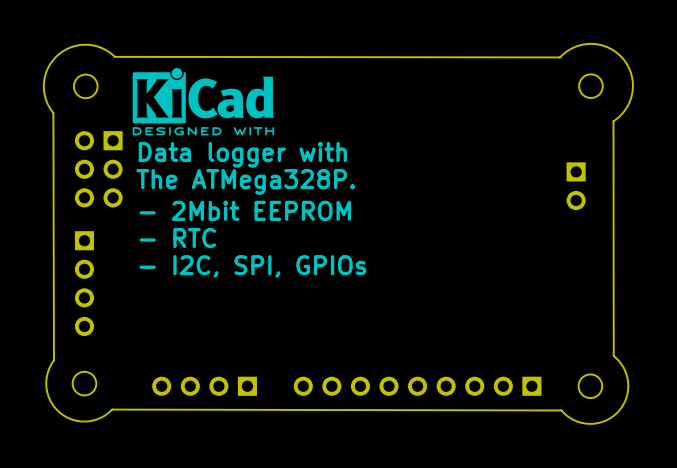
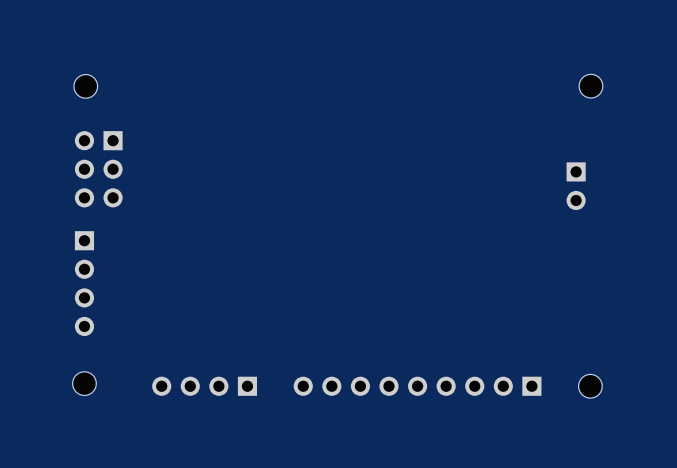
board edge: (114, 56) (96, 46) (75, 45) (61, 52) (53, 59) (44, 78) (44, 94) (53, 113) (53, 360) -> none
board edge: (115, 56) (560, 57) (572, 48) (586, 44) (597, 44) (611, 49) (626, 62) (632, 77) (632, 87) (627, 106) (613, 121) (613, 356) -> none
drawing: [132, 68, 275, 136] -> none
text: Data logger with (242, 154) -> none
text: The ATMega328P. (245, 181) -> none
text: - 2Mbit EEPROM (245, 210) -> none
text: - RTC (177, 238) -> none
text: - I2C, SPI, GPIOs (252, 266) -> none
board edge: (613, 356) (625, 371) (628, 380) (627, 395) (620, 408) (614, 415) (601, 422) (591, 423) (572, 419) (561, 410) (112, 409) (96, 419) (81, 421) (63, 415) (56, 409) (48, 396) (46, 378) (53, 360) -> none

